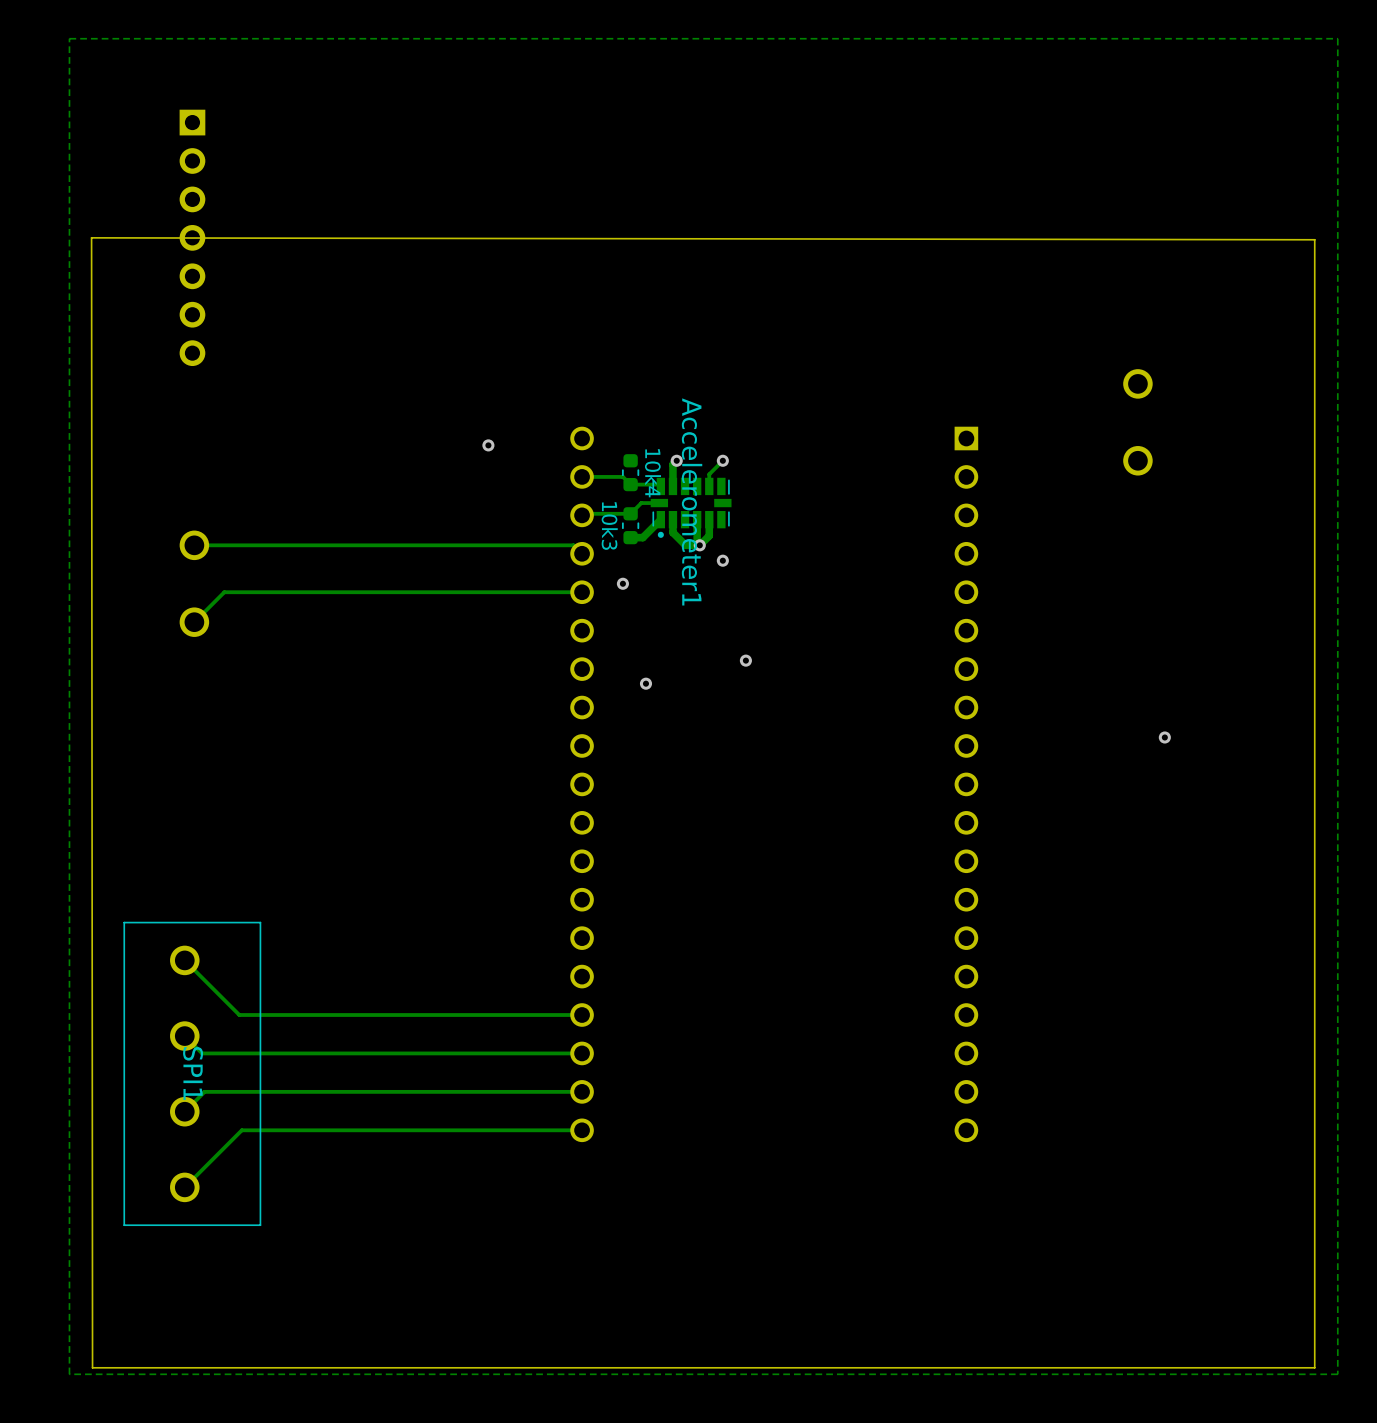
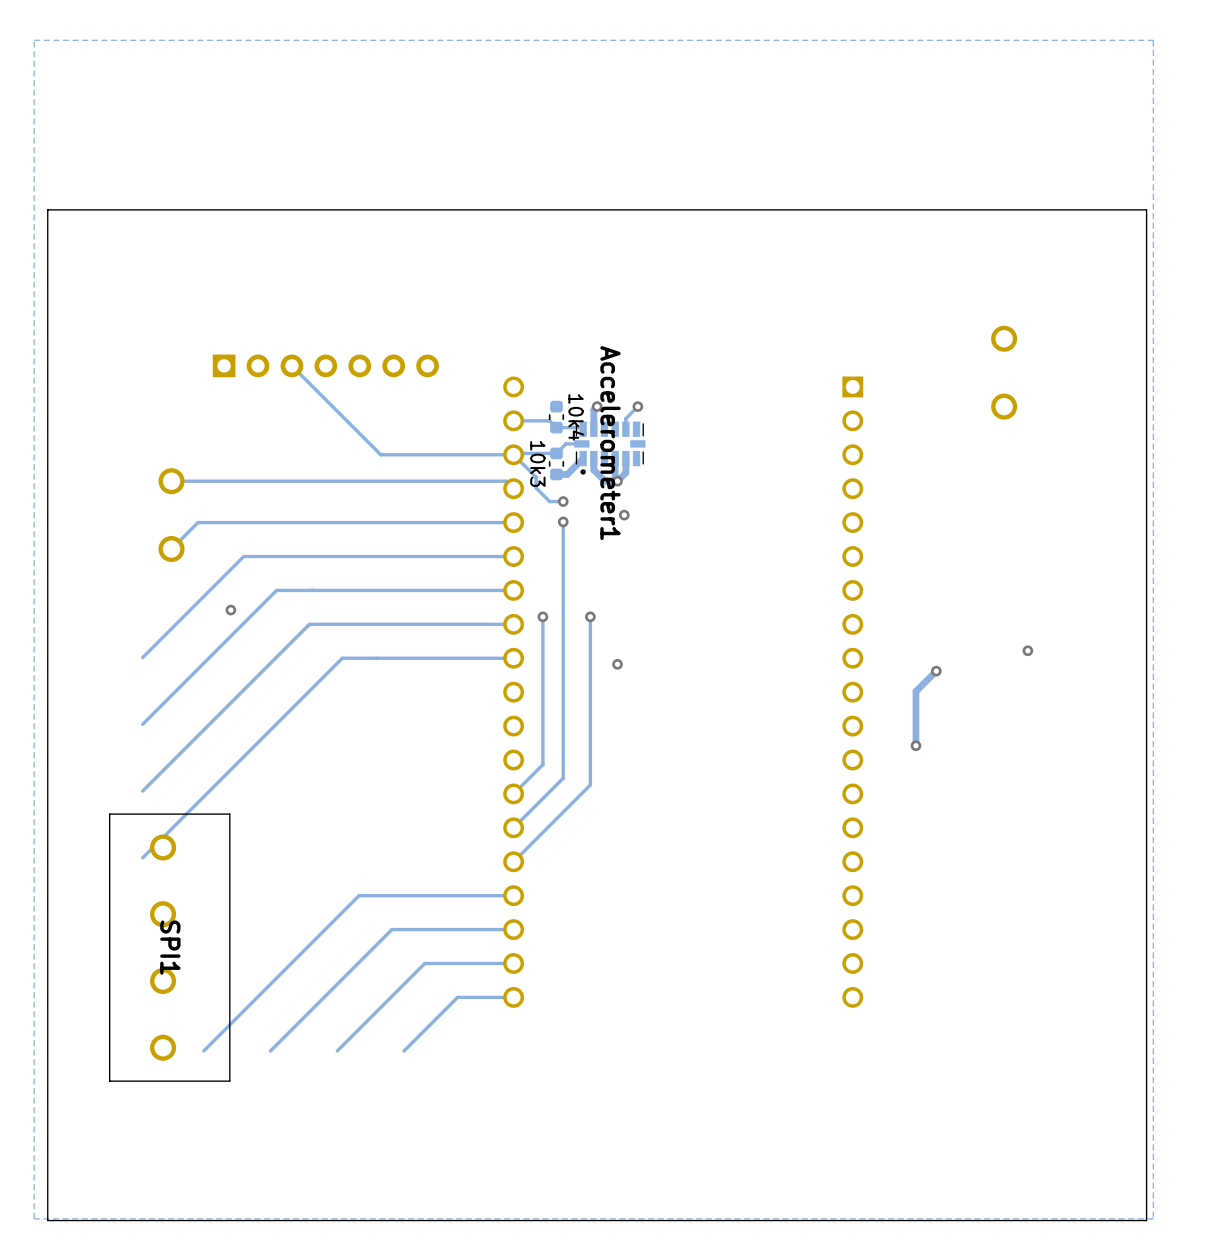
zone outline: (1337, 38) (69, 38) (69, 1374) (1337, 1374) (1337, 38) -> (1153, 40) (34, 40) (34, 1218) (1153, 1218) (1153, 40)
board edge: (91, 237) (1314, 239) (1314, 1367) (92, 1367) (91, 237) -> (1146, 209) (1146, 1220) (47, 1220) (47, 209) (1146, 209)
part rotation: 0° (192, 237) -> 90° counterclockwise (325, 365)
part position: (192, 237) -> (325, 365)
track: none -> (291, 365) (380, 454) (513, 454) (536, 477) (536, 487) (549, 501) (563, 501)
via: (488, 445) -> none
via position: (722, 560) -> (624, 515)
via: none -> (563, 501)
via: (622, 583) -> none
track: none -> (563, 521) (563, 778) (513, 827)
via: none -> (563, 521)
track: none -> (243, 556) (142, 657)
track: none -> (513, 556) (245, 556)
via: (745, 660) -> none
track: none -> (513, 590) (276, 590) (142, 724)
via: (645, 683) -> none
via: none -> (230, 610)
track: none -> (542, 616) (542, 764) (513, 793)
via: none -> (542, 616)
track: none -> (590, 616) (590, 784) (513, 861)
via: none -> (590, 616)
track: none -> (513, 624) (309, 624) (142, 791)
track: none -> (513, 658) (342, 658) (142, 857)
via: none -> (617, 664)
track: none -> (936, 671) (915, 691) (915, 745)
via: none -> (936, 671)
via: none -> (915, 745)
track: (184, 960) (239, 1015) (406, 1015) -> (203, 1050) (359, 895)
track: (184, 1036) (202, 1053) (444, 1053) -> (270, 1050) (391, 929)
track: (481, 1091) (204, 1091) (184, 1111) -> (424, 963) (337, 1050)
track: (518, 1130) (241, 1130) (184, 1187) -> (457, 997) (404, 1050)

